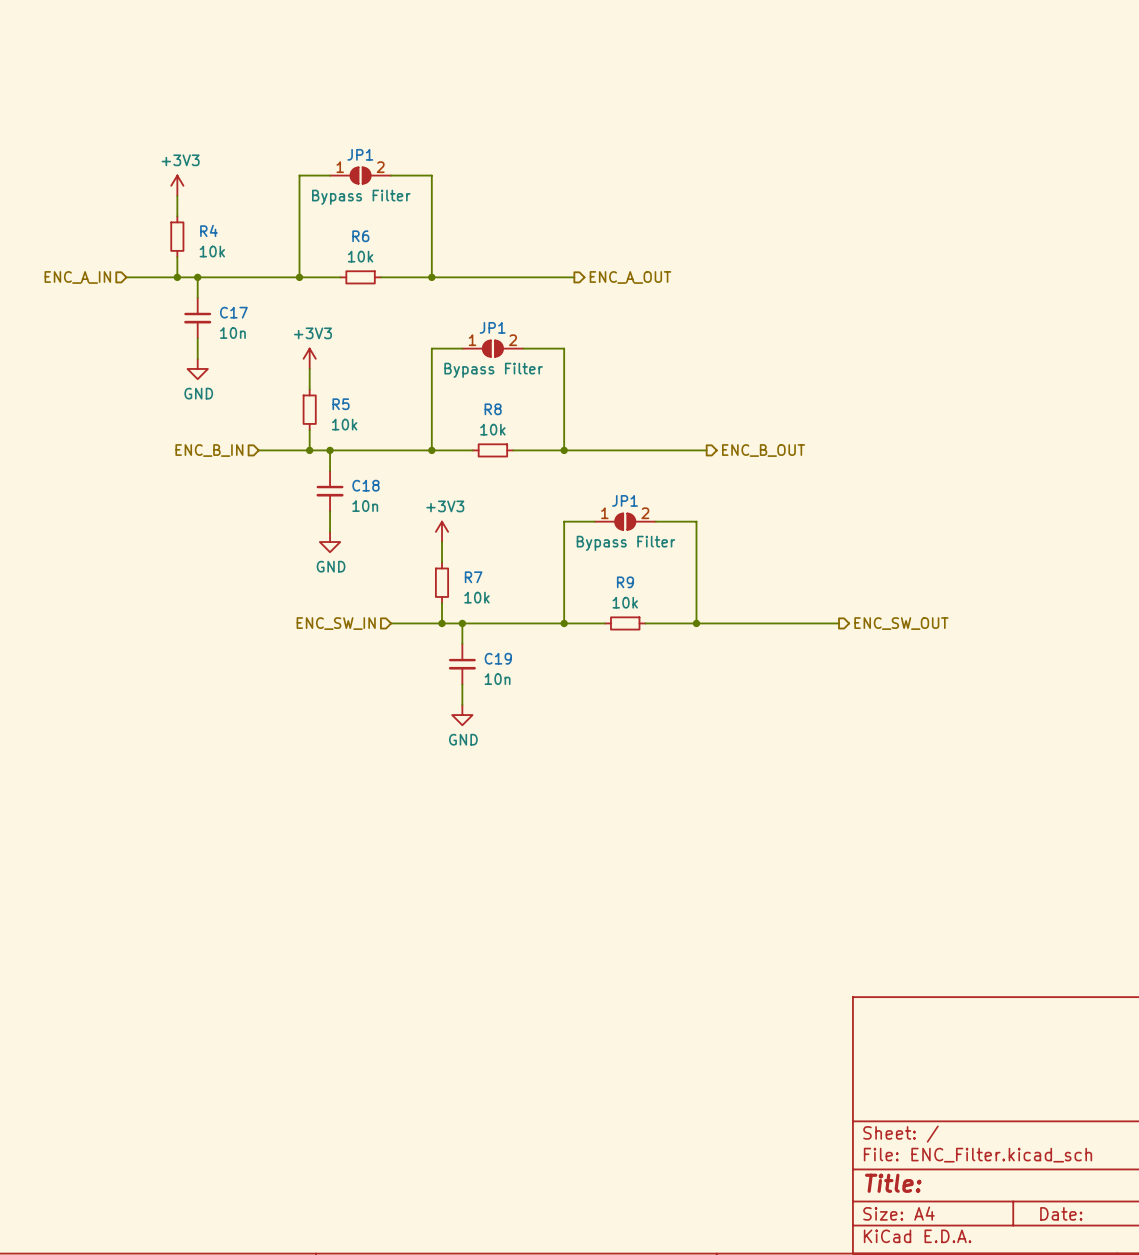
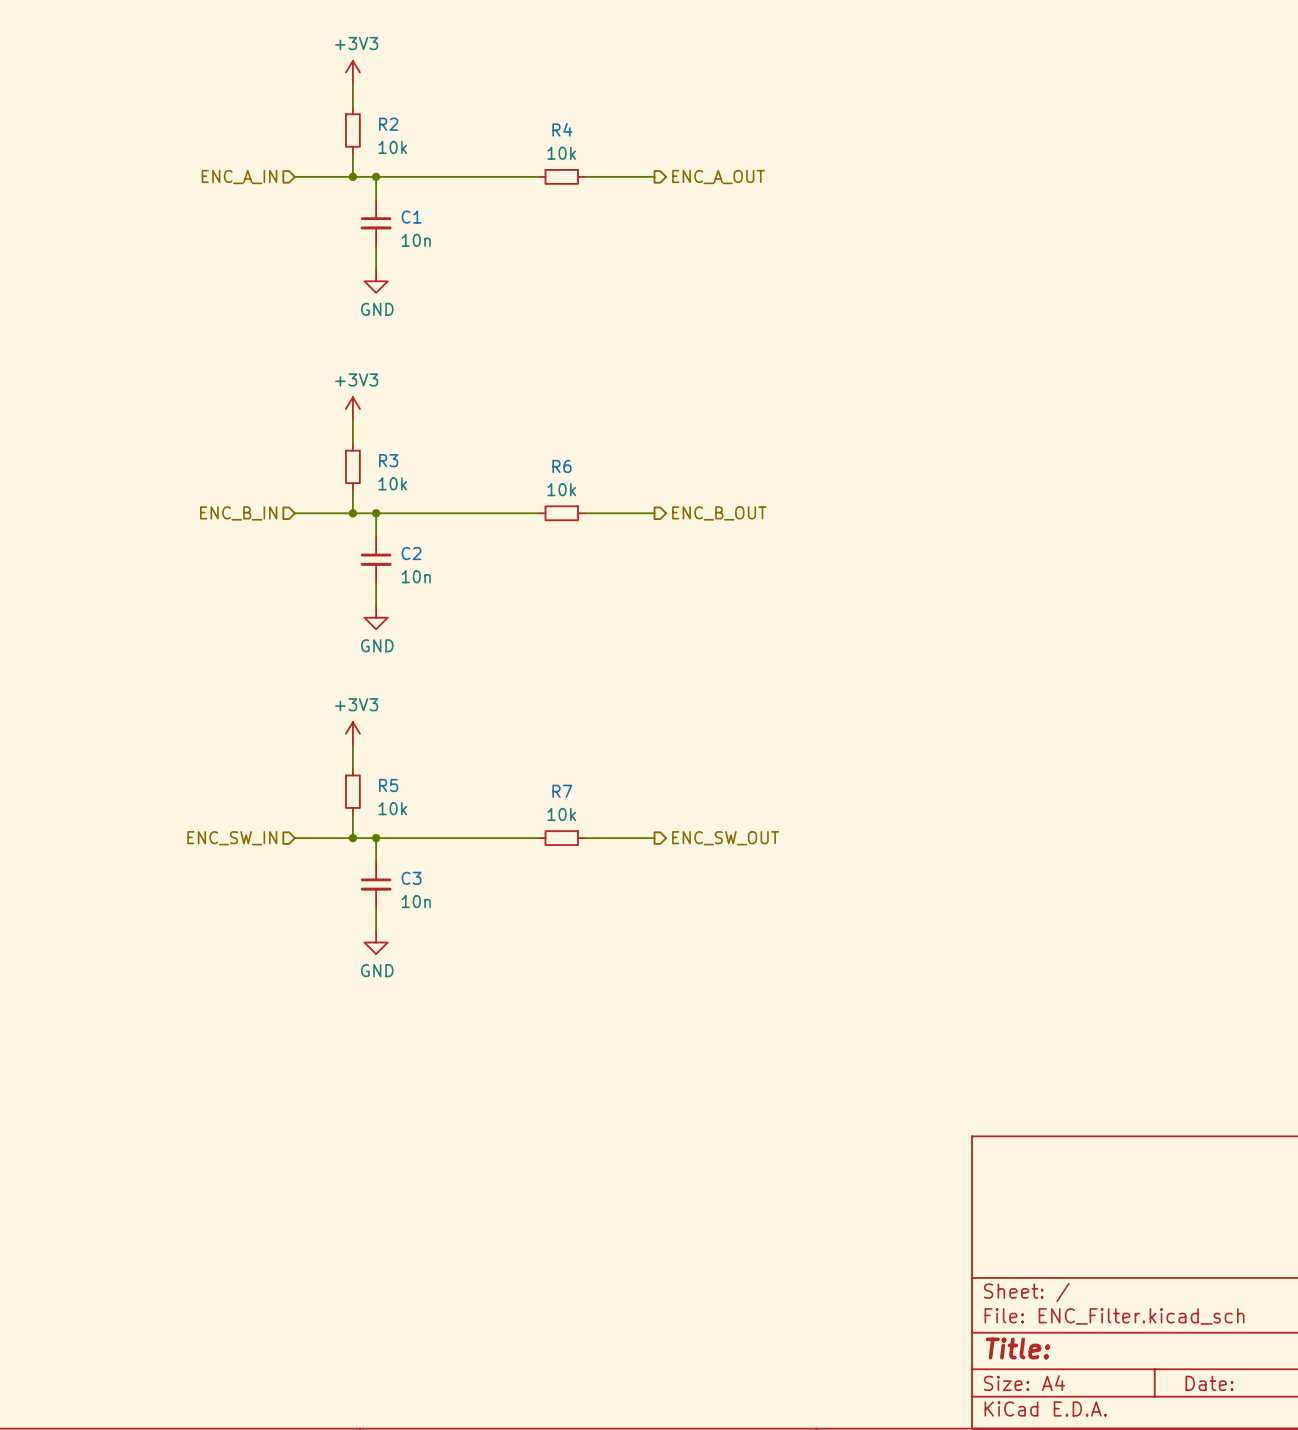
R2: none -> 10k (352, 130)
junction: none -> (352, 176)
junction: none -> (376, 176)
wire: none -> (584, 176) (654, 176)
wire: (330, 175) (299, 175) (299, 277) -> (376, 200) (376, 176)
JP1: Bypass Filter (360, 175) -> none
wire: (391, 175) (431, 175) (431, 277) -> none
power symbol position: +3V3 (177, 185) -> +3V3 (352, 72)
wire: (177, 195) (177, 216) -> (352, 84) (352, 107)
C1: none -> 10n (376, 223)
R4 name position: R4 (208, 230) -> R4 (562, 129)
R4 rotation: 0° (177, 236) -> 90° clockwise (561, 176)
R4 position: (177, 236) -> (561, 176)
R4 value position: 10k (212, 251) -> 10k (561, 153)
wire: (177, 257) (177, 277) -> (352, 153) (352, 176)
hierarchical label position: ENC_A_IN (77, 277) -> ENC_A_IN (239, 177)
wire: (126, 277) (340, 277) -> (294, 176) (538, 176)
junction: (177, 277) -> none
wire: (197, 277) (197, 297) -> none
junction: (197, 277) -> none
junction: (299, 277) -> none
R6: 10k (360, 277) -> none
wire: (380, 277) (574, 277) -> none
junction: (431, 277) -> none
hierarchical label position: ENC_A_OUT (630, 277) -> ENC_A_OUT (718, 177)
C17: 10n (197, 318) -> none
wire: (197, 338) (197, 358) -> (376, 246) (376, 269)
wire: (462, 348) (431, 348) (431, 450) -> none
JP1: Bypass Filter (492, 348) -> none
wire: (523, 348) (564, 348) (564, 450) -> none
power symbol position: GND (197, 368) -> GND (376, 281)
R5 name: R5 (341, 404) -> R3 (388, 460)
R8 name: R8 (493, 409) -> R6 (562, 466)
junction: (431, 450) -> none
junction: (564, 450) -> none
wire: (574, 450) (706, 450) -> none
hierarchical label position: ENC_B_OUT (763, 450) -> ENC_B_OUT (719, 513)
C18 name: C18 (365, 485) -> C2 (411, 553)
wire: (594, 521) (564, 521) (564, 623) -> none
JP1: Bypass Filter (625, 521) -> none
wire: (655, 521) (696, 521) (696, 623) -> none
power symbol position: +3V3 (442, 531) -> +3V3 (352, 733)
wire: (442, 542) (442, 562) -> (352, 745) (352, 768)
R7 name position: R7 (473, 577) -> R7 (562, 791)
R7 rotation: 0° (442, 582) -> 90° clockwise (561, 838)
R7 position: (442, 582) -> (561, 838)
R7 value position: 10k (476, 597) -> 10k (561, 814)
wire: (442, 603) (442, 623) -> (352, 814) (352, 838)
hierarchical label position: ENC_SW_IN (336, 623) -> ENC_SW_IN (232, 838)
wire: (391, 623) (604, 623) -> (294, 838) (538, 838)
junction: (442, 623) -> none
wire: (462, 623) (462, 643) -> (376, 838) (376, 861)
junction: (462, 623) -> none
junction: (564, 623) -> none
R9: 10k (625, 623) -> none
wire: (645, 623) (839, 623) -> none
junction: (696, 623) -> none
hierarchical label: ENC_SW_OUT (901, 623) -> none
C19: 10n (462, 664) -> none
wire: (462, 684) (462, 704) -> (376, 907) (376, 930)
R5: none -> 10k (352, 791)
power symbol position: GND (462, 715) -> GND (376, 942)
junction: none -> (352, 838)
junction: none -> (376, 838)
wire: none -> (584, 838) (654, 838)
hierarchical label: none -> ENC_SW_OUT (725, 838)
C3: none -> 10n (376, 884)

